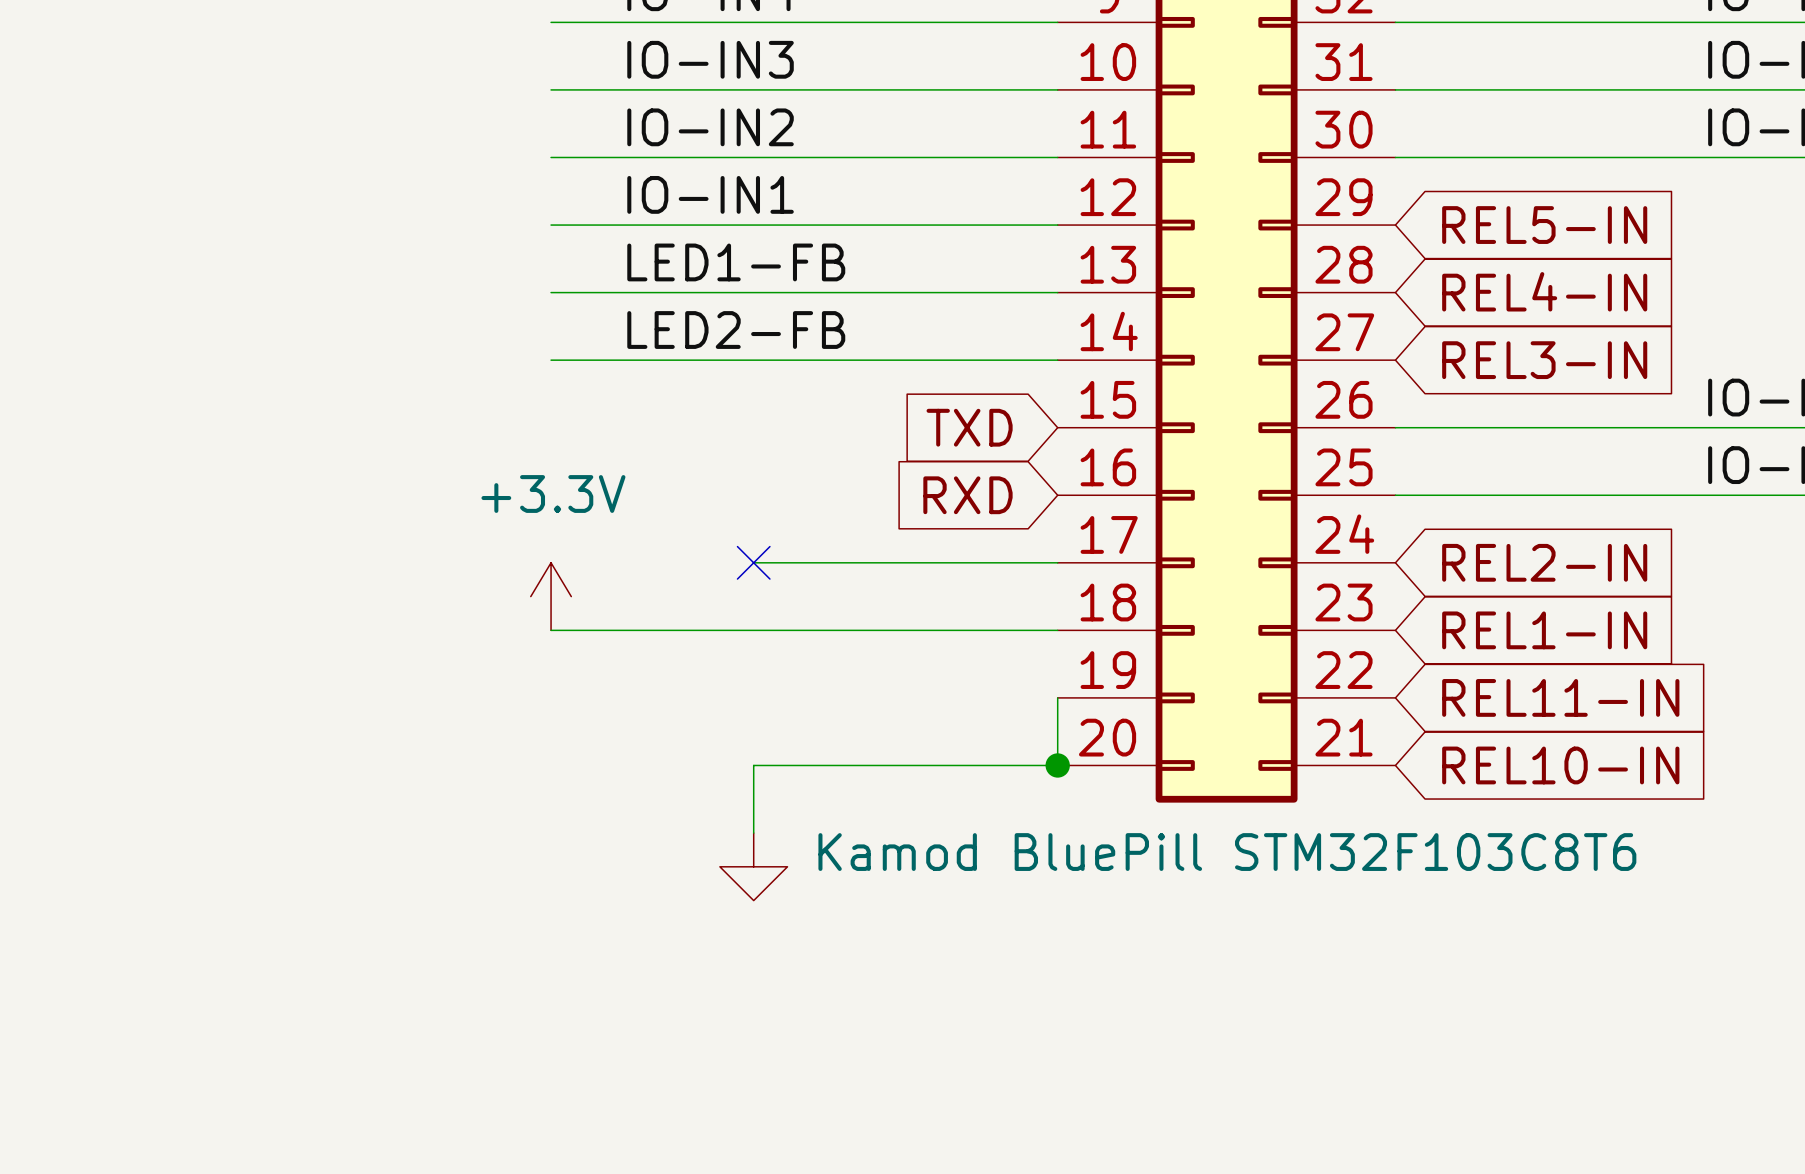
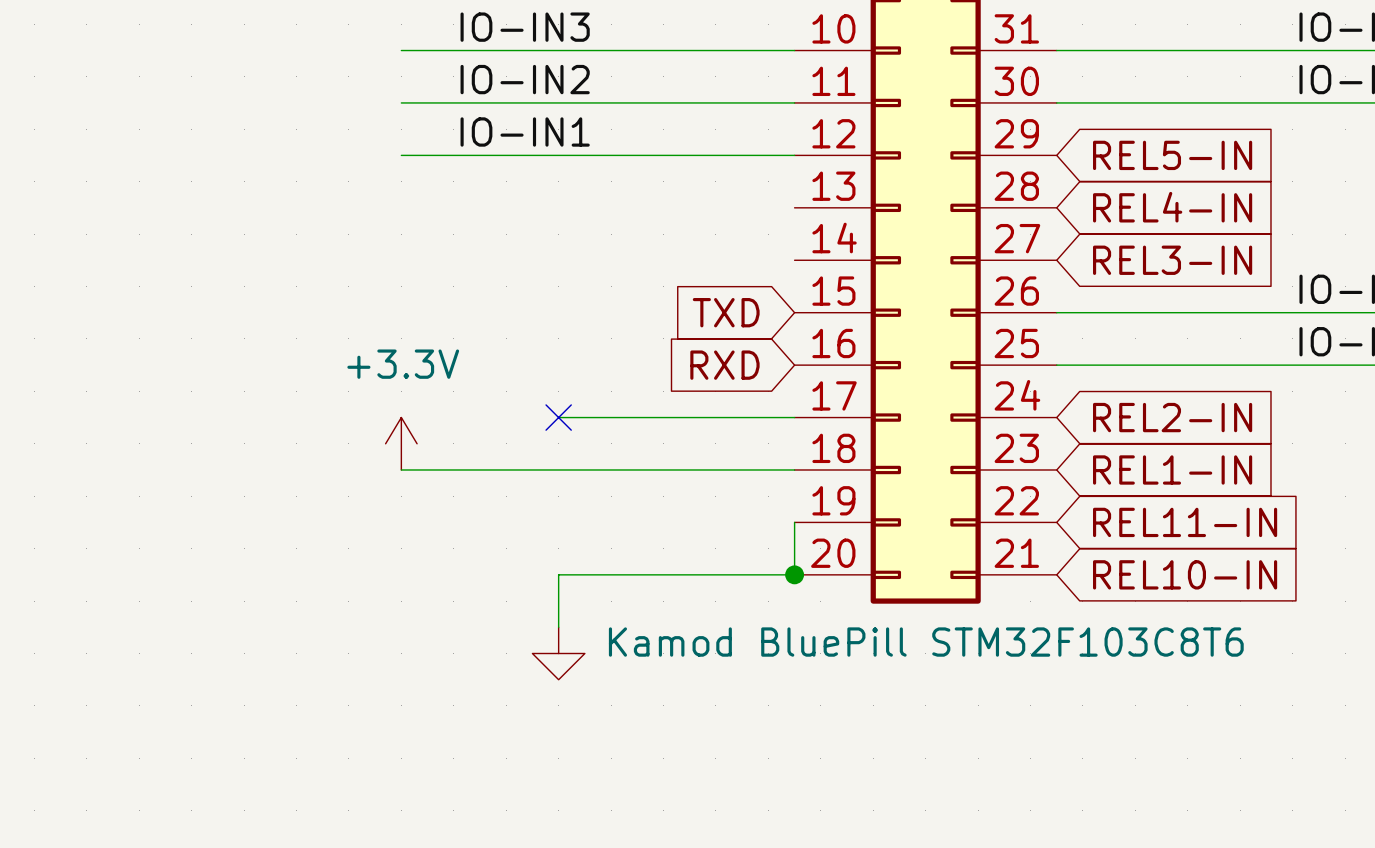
label: LED1-FB (736, 262) -> none
wire: (551, 292) (1057, 292) -> none
label: LED2-FB (736, 330) -> none
wire: (551, 360) (1057, 360) -> none

